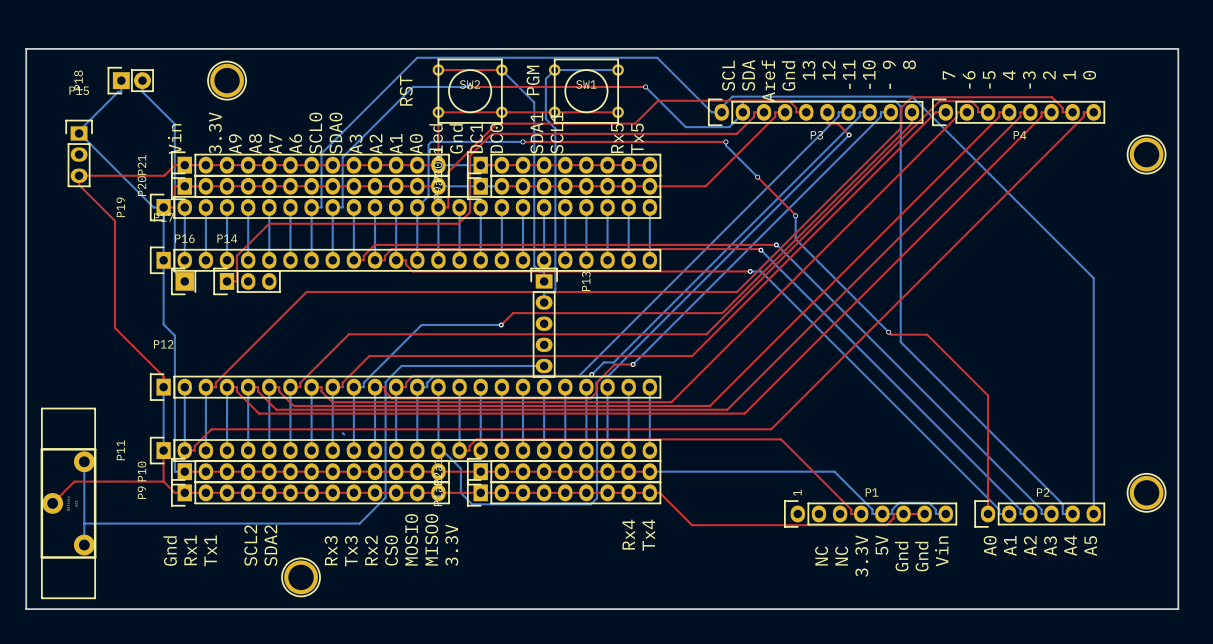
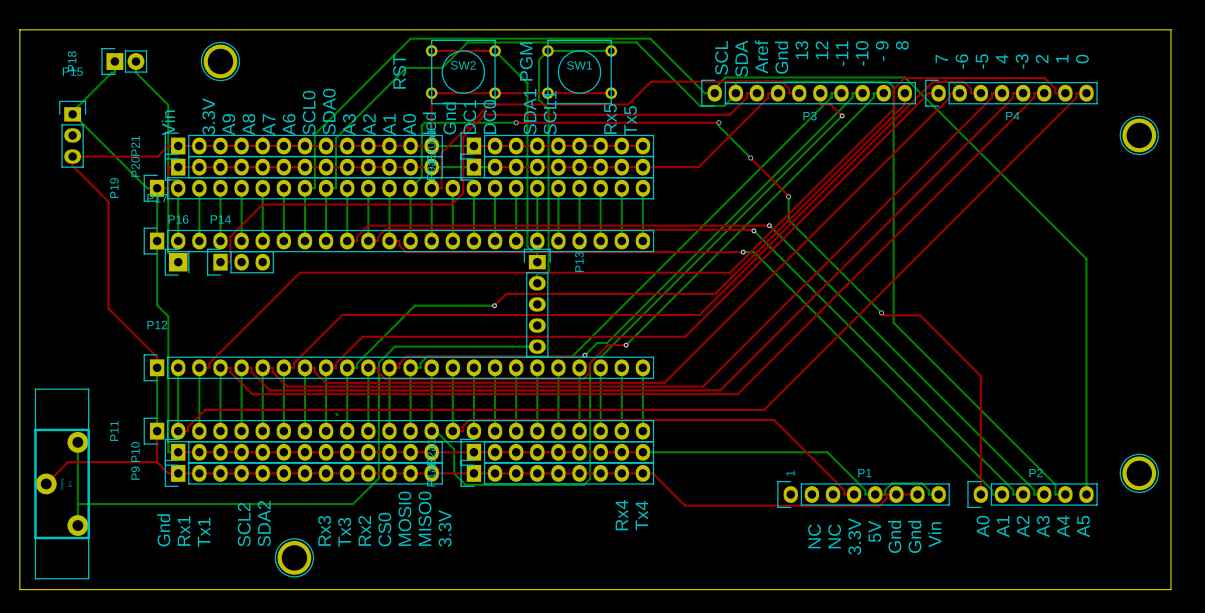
bottom track: (449, 86) (470, 86) -> none
top track: (470, 86) (645, 86) -> none
via: (470, 86) -> none
bottom track: (645, 86) (685, 127) (729, 127) (731, 125) -> (442, 67) (467, 42) (636, 42) (699, 105) (724, 105)
via: (645, 86) -> none

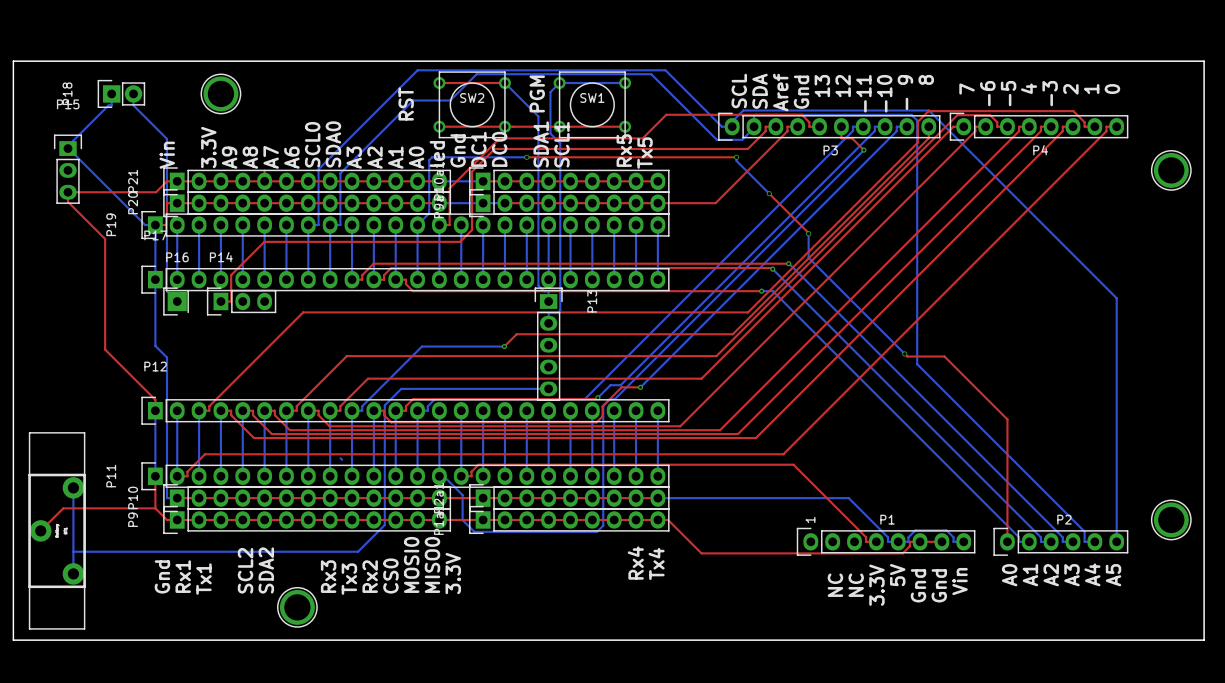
top track: (431, 93) (431, 146) -> none

